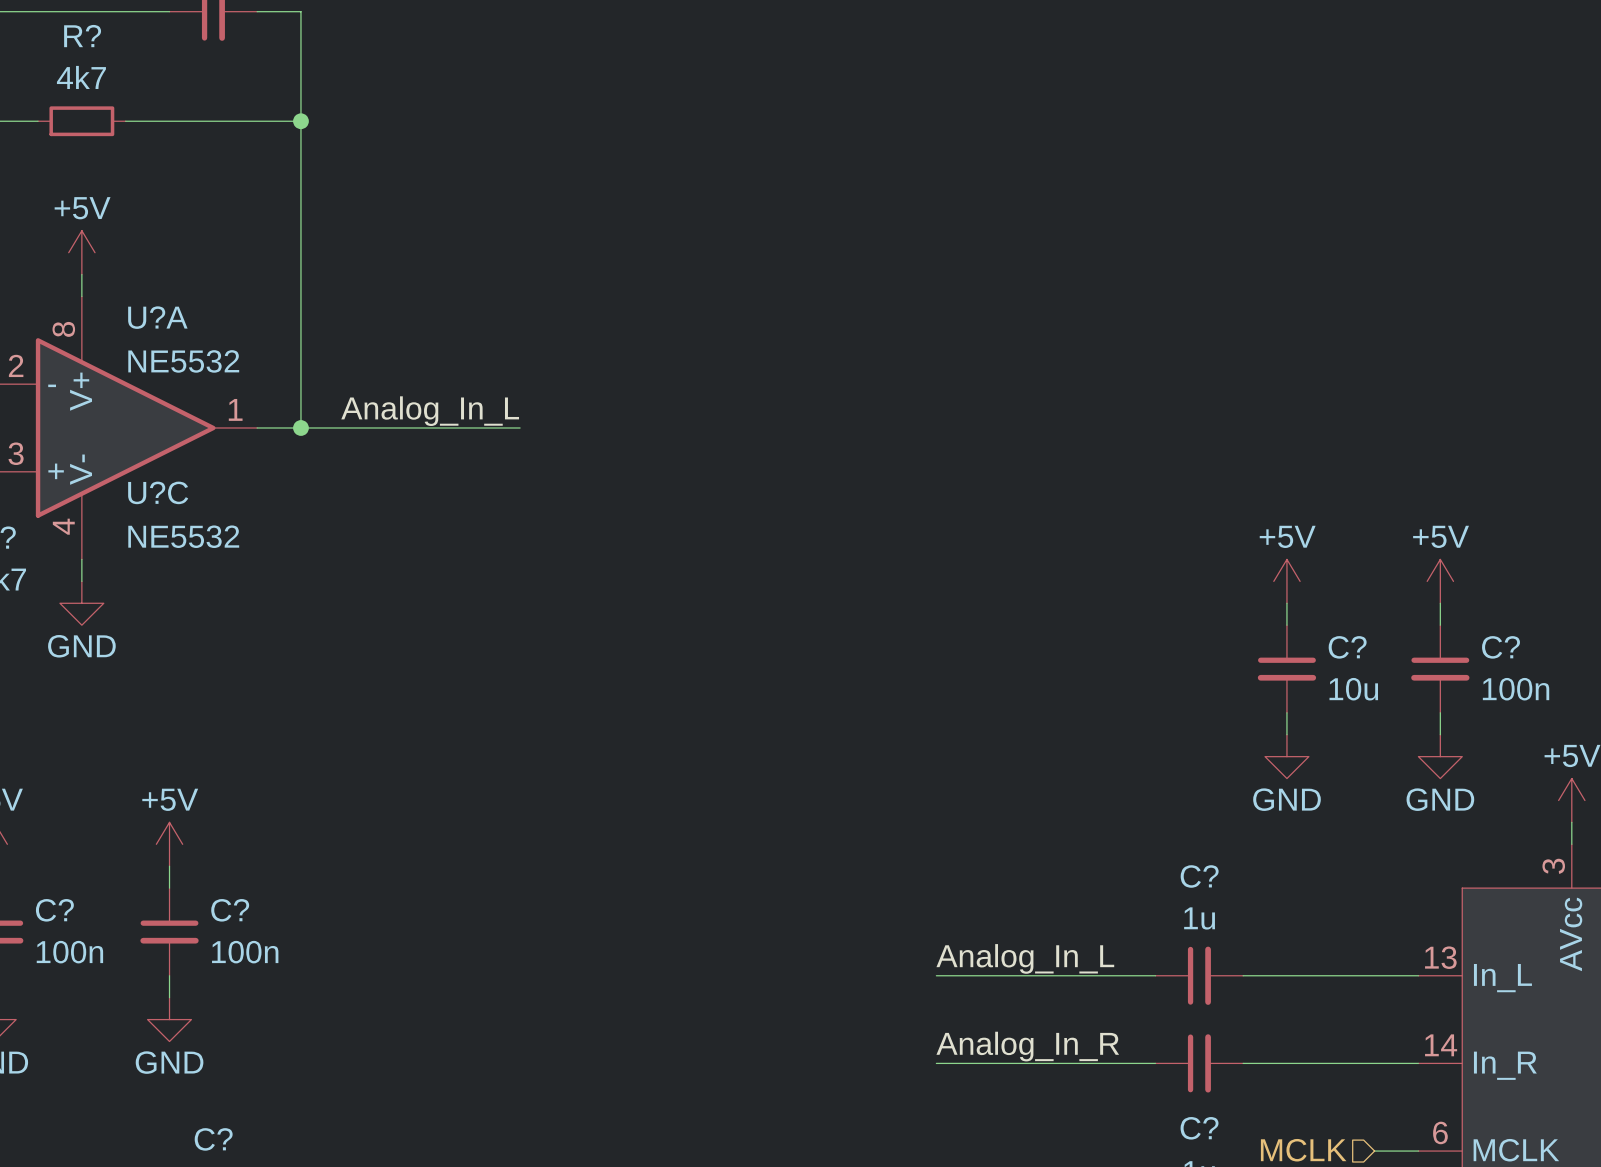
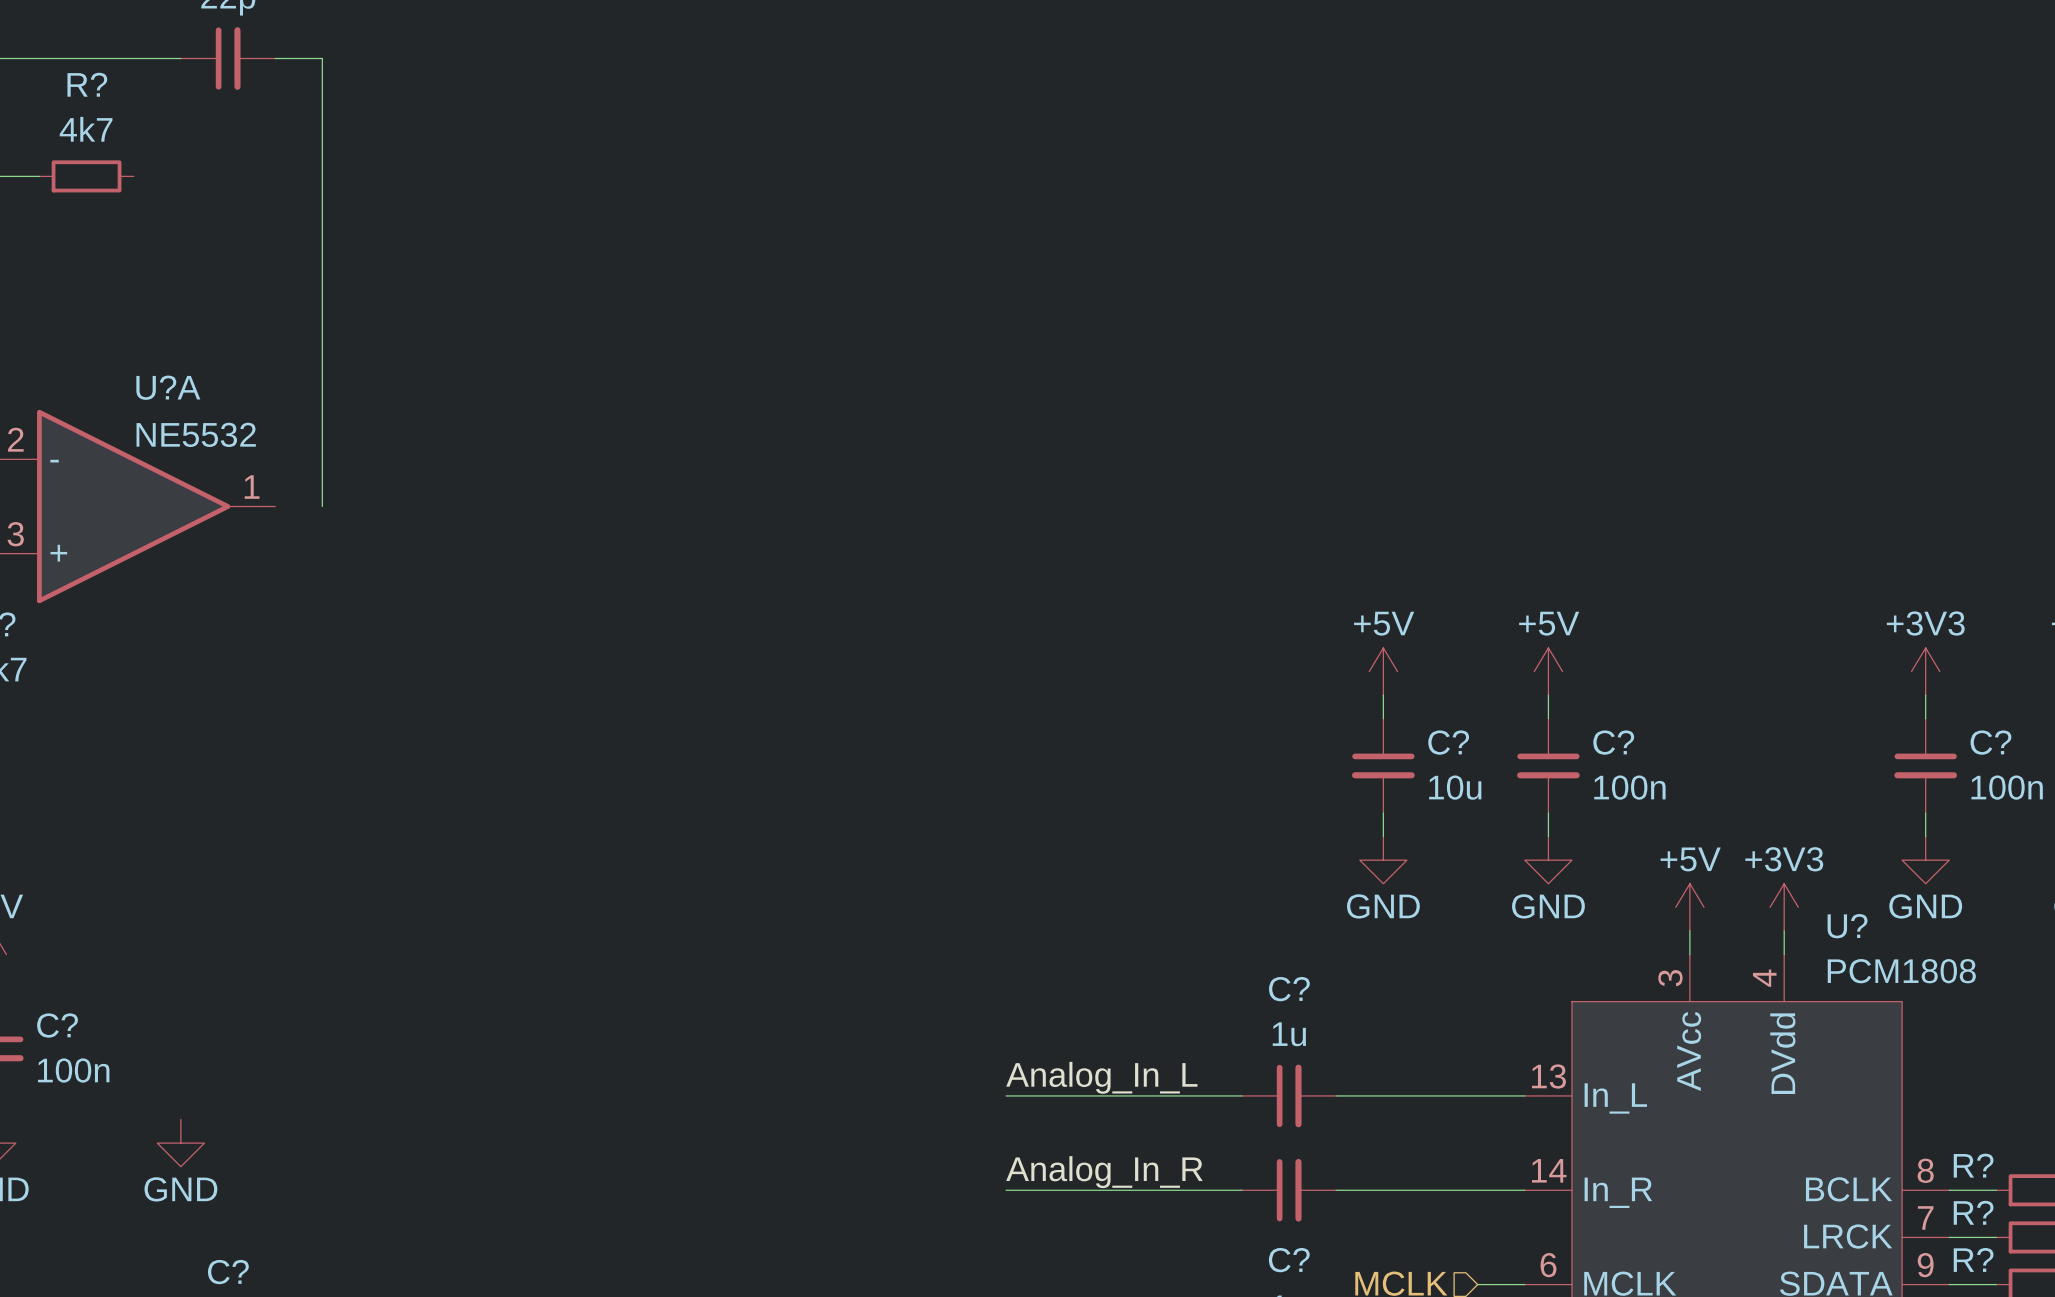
wire: (125, 121) (300, 121) -> none
junction: (300, 121) -> none
power symbol: +5V (81, 252) -> none
wire: (81, 274) (81, 296) -> none
label: Analog_In_L (430, 411) -> none
U?C: NE5532 (81, 427) -> none
wire: (257, 427) (520, 427) -> none
junction: (300, 427) -> none
wire: (81, 559) (81, 581) -> none
power symbol: GND (81, 603) -> none
power symbol: +5V (169, 844) -> none
wire: (169, 866) (169, 888) -> none
C?: 100n (169, 931) -> none
wire: (169, 975) (169, 997) -> none

